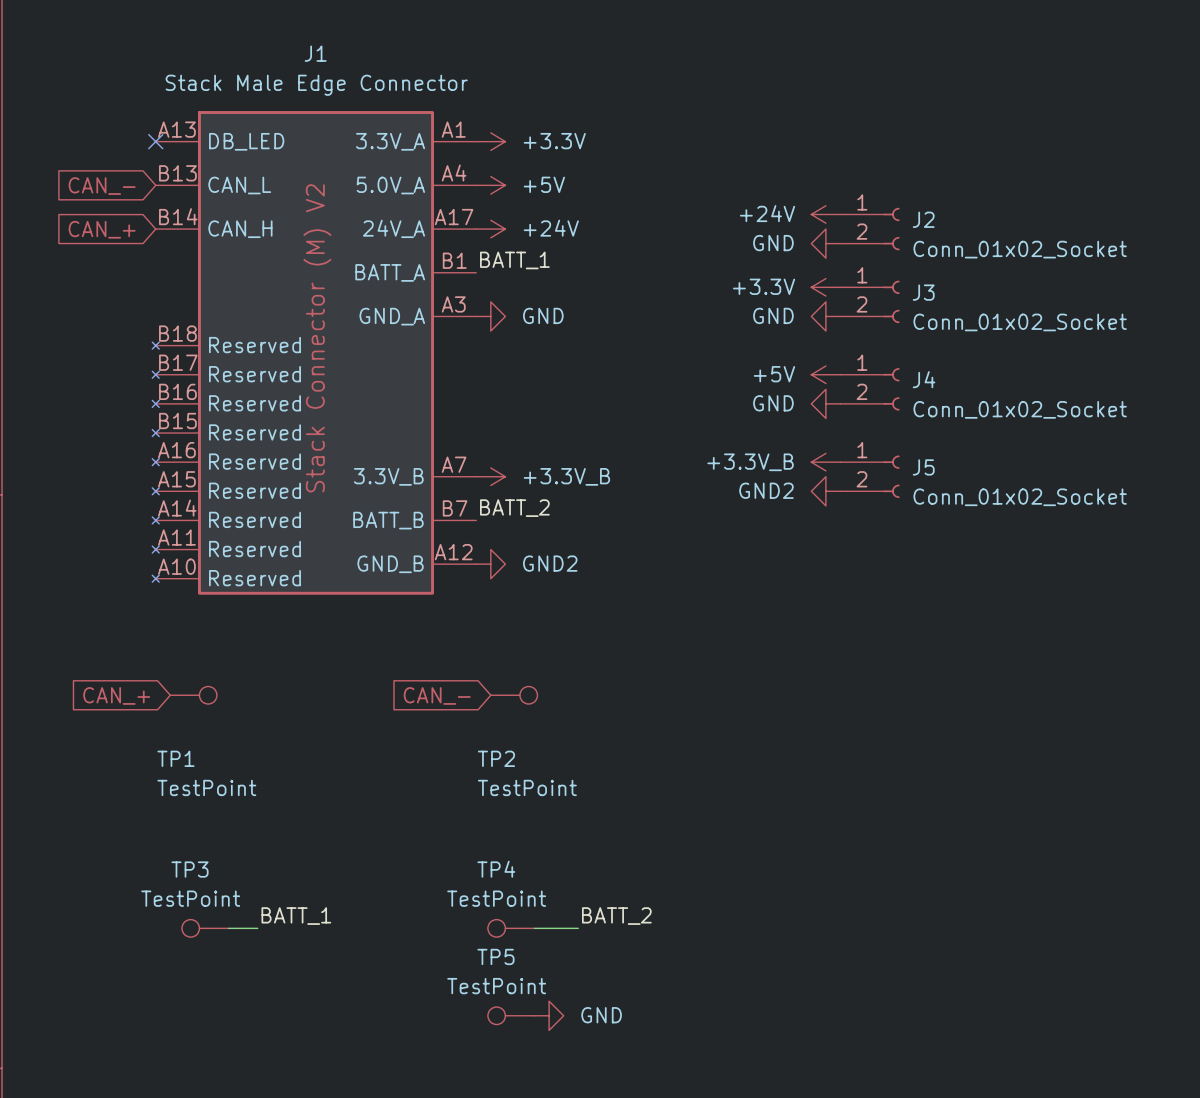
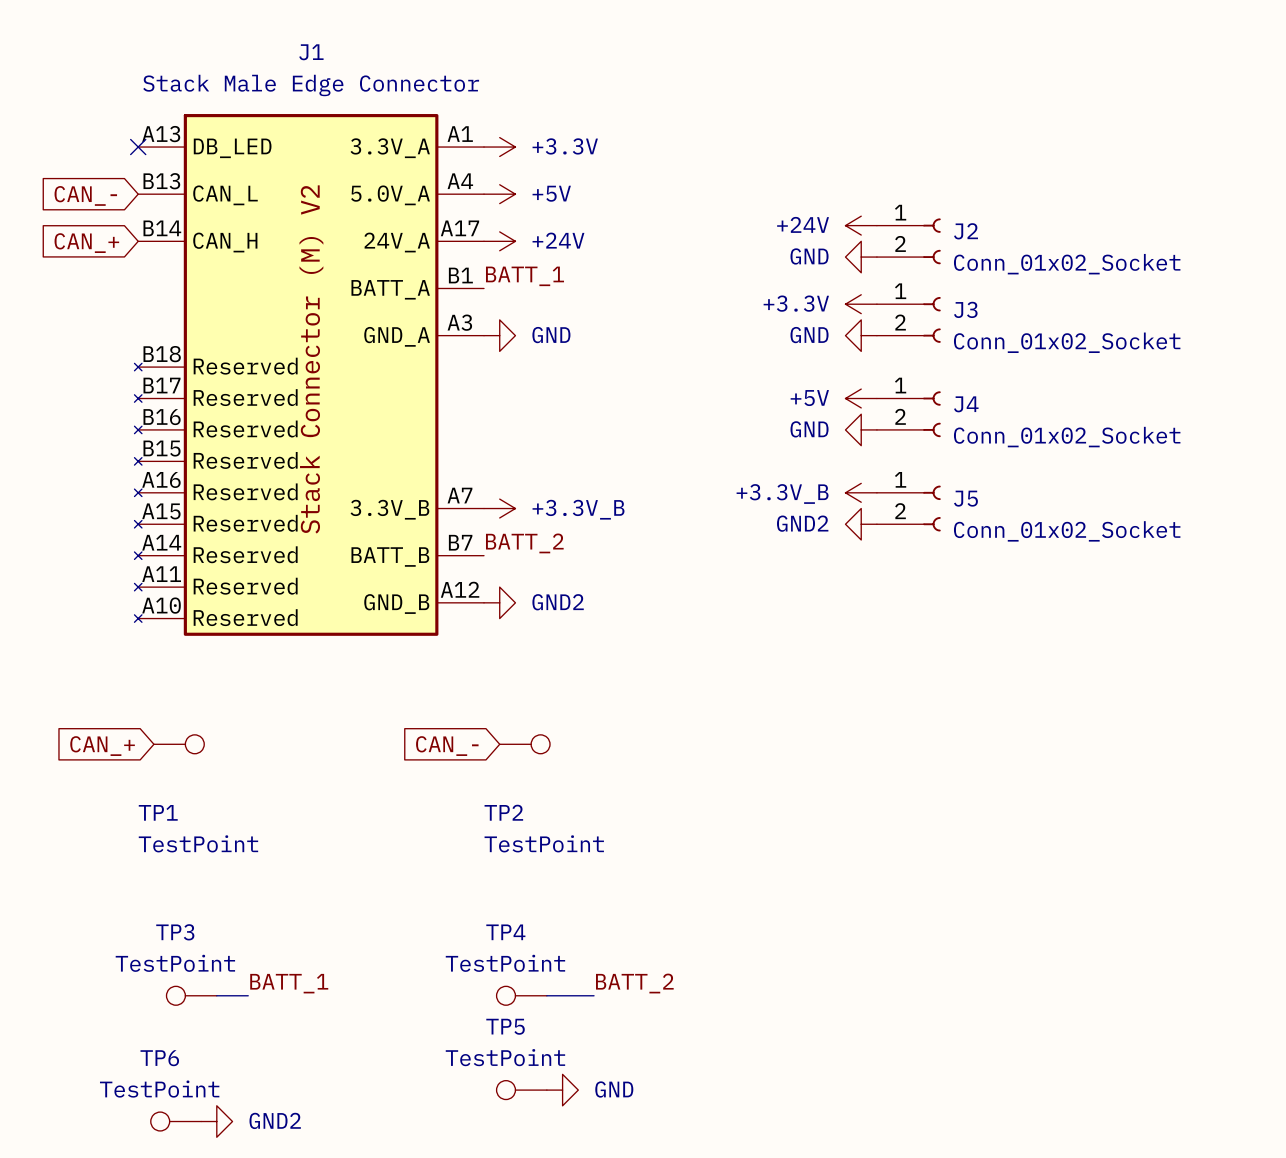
TP6: none -> TestPoint (175, 1121)
power symbol: none -> GND2 (216, 1121)

